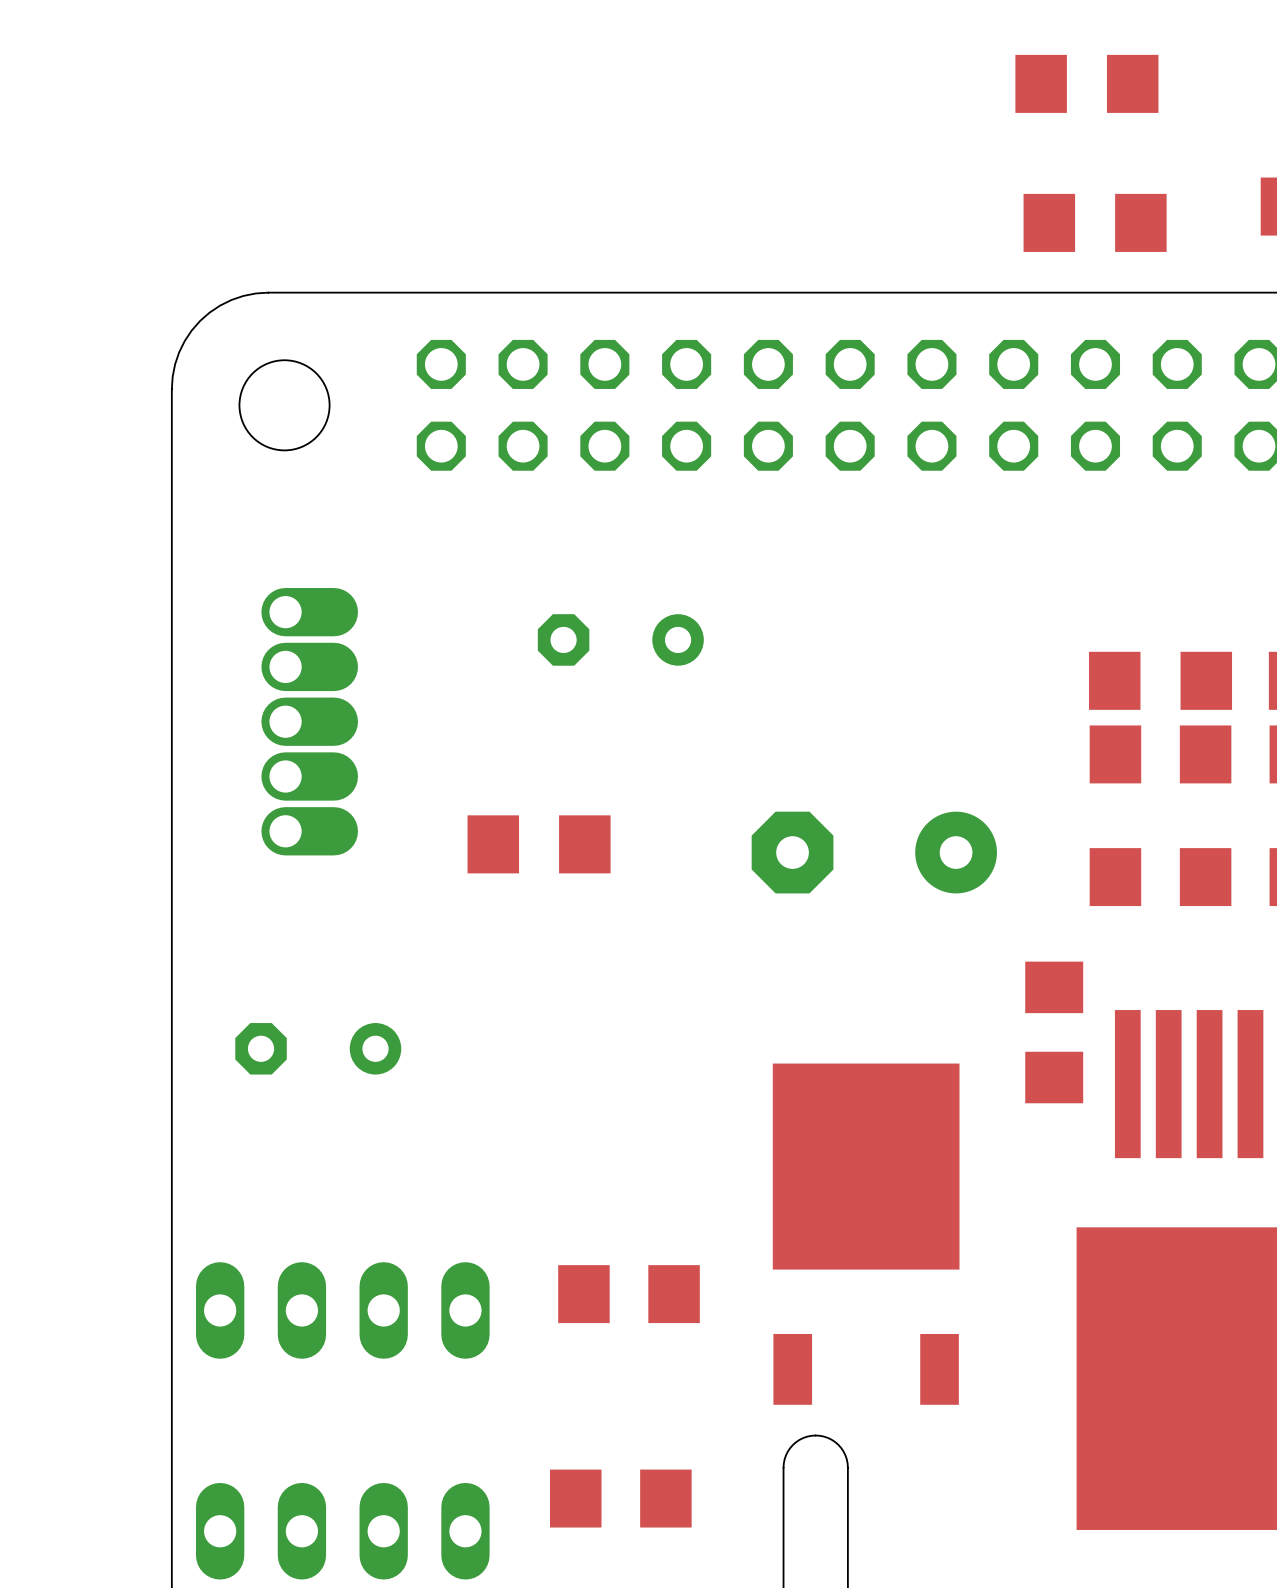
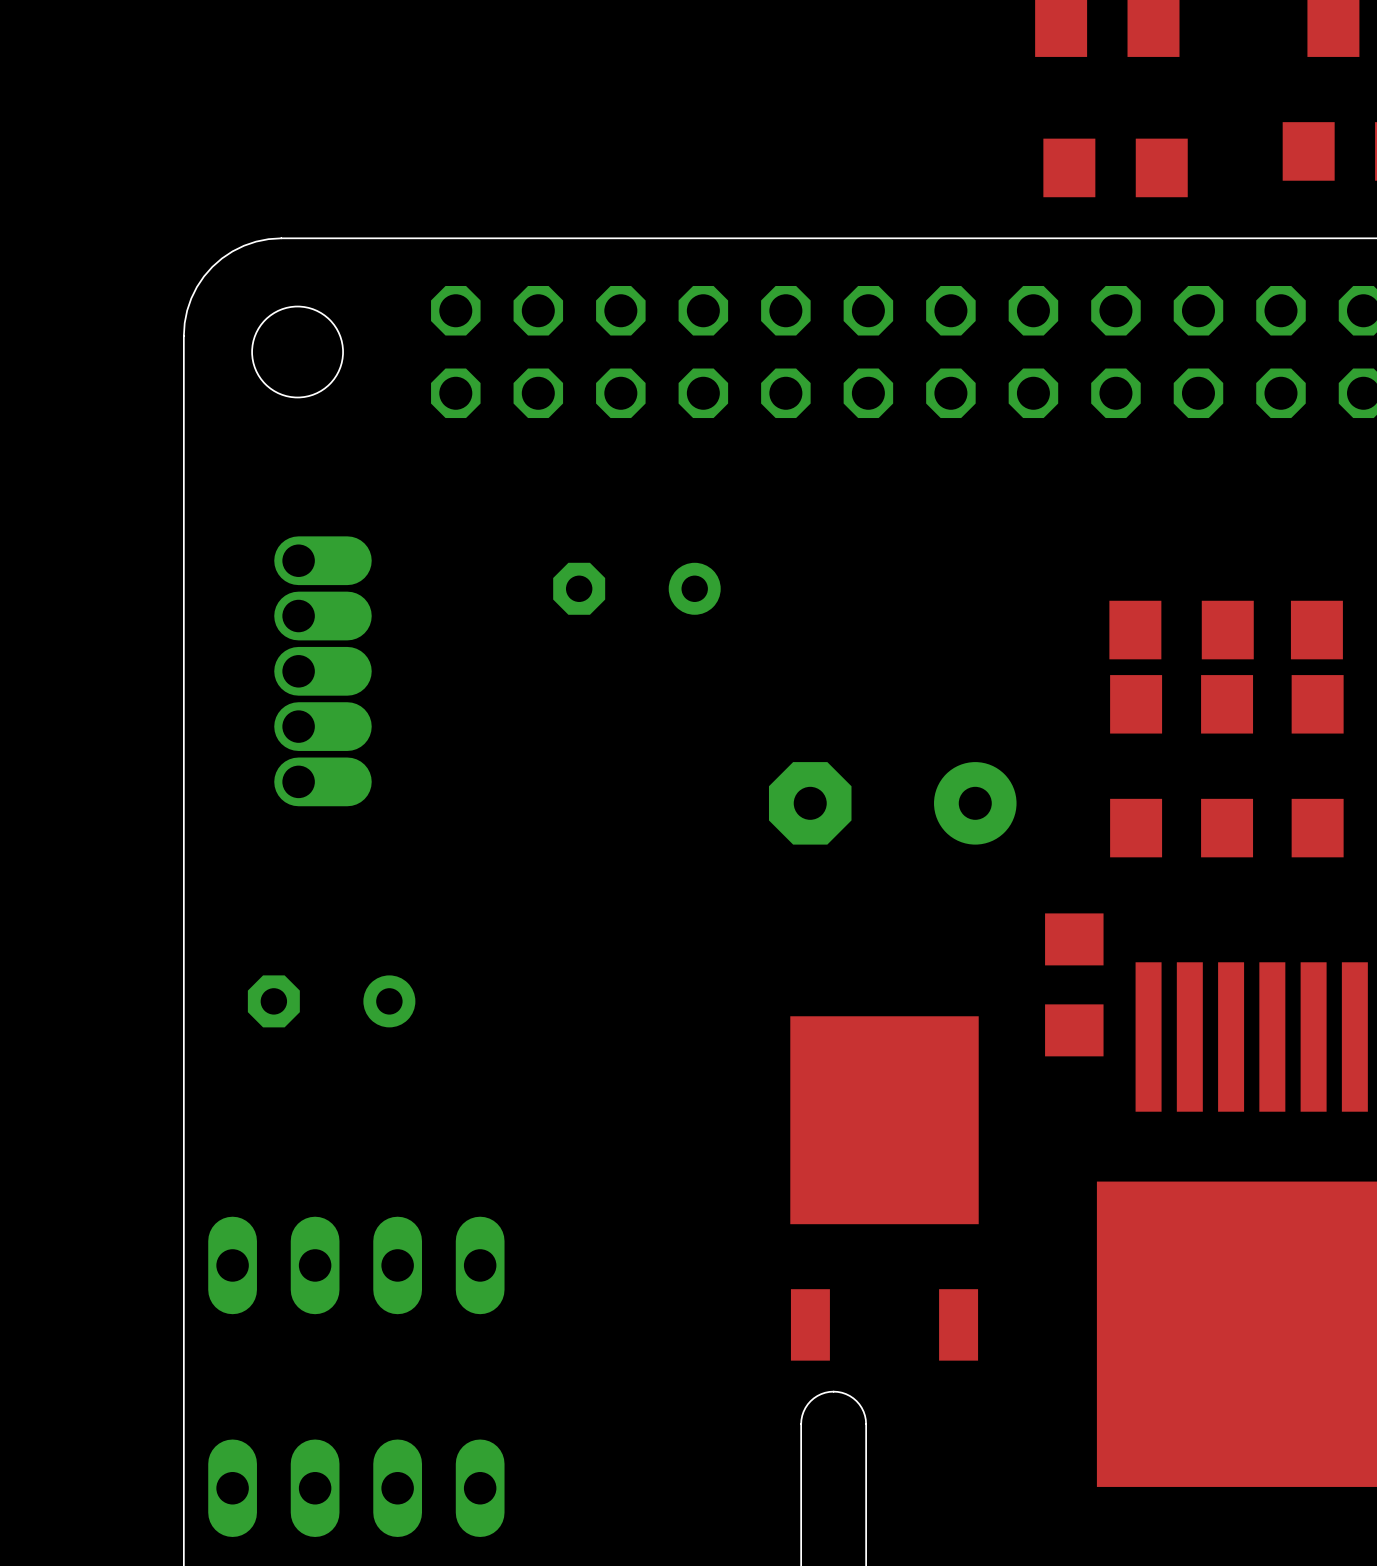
part: (539, 844) -> none
part: (629, 1294) -> none
part: (620, 1498) -> none

